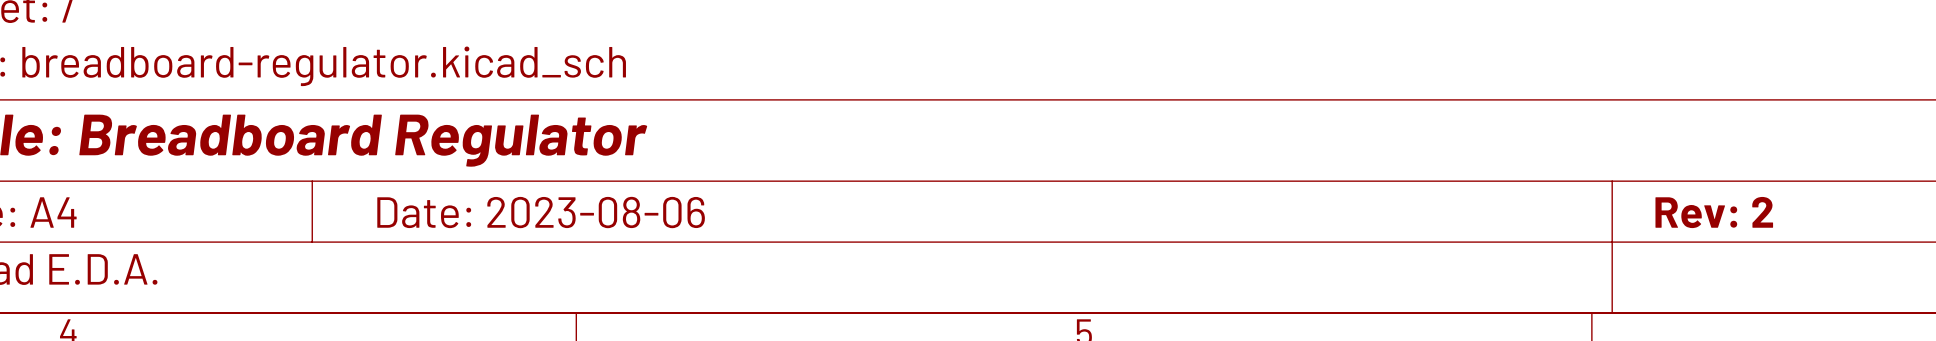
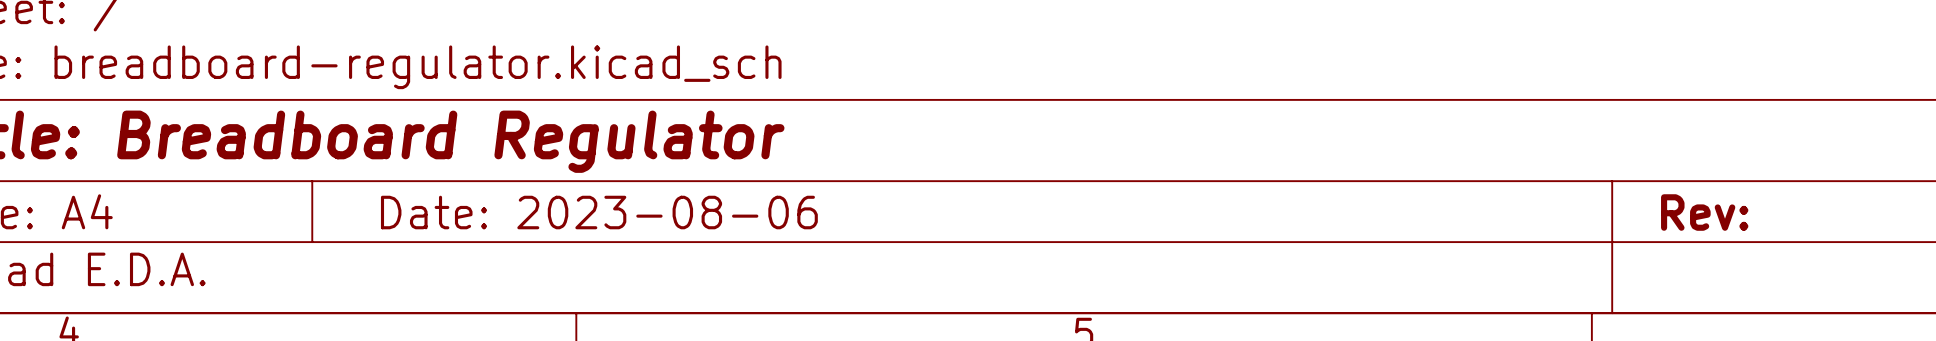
title block: Rev: 2 (1714, 212) -> Rev: (1704, 212)

